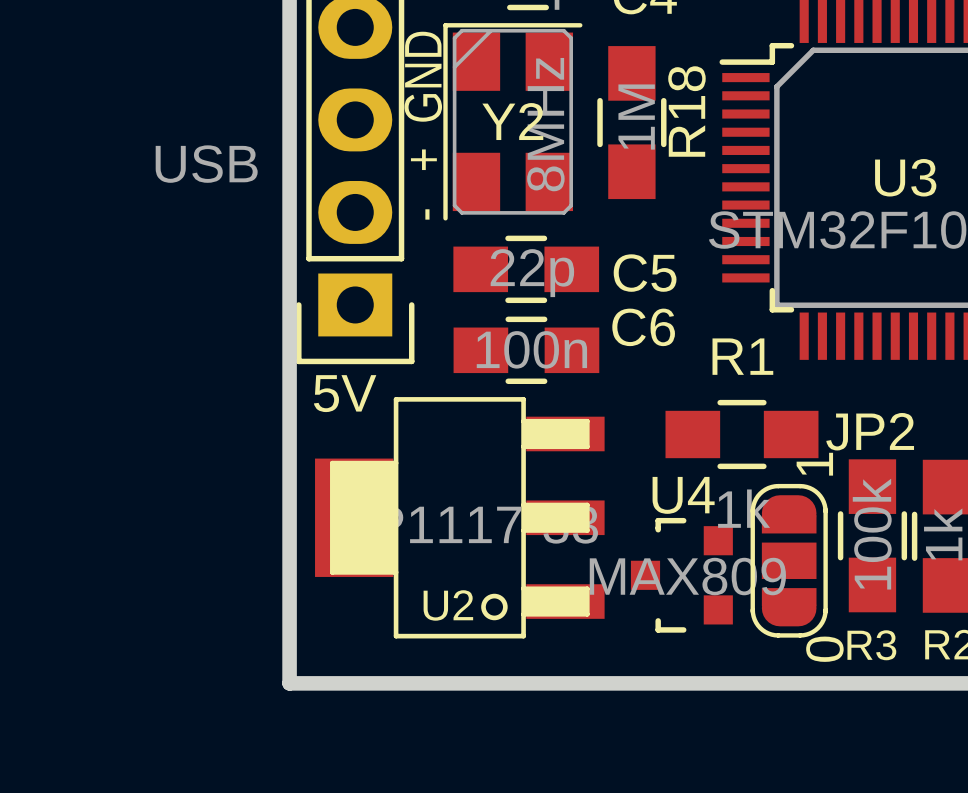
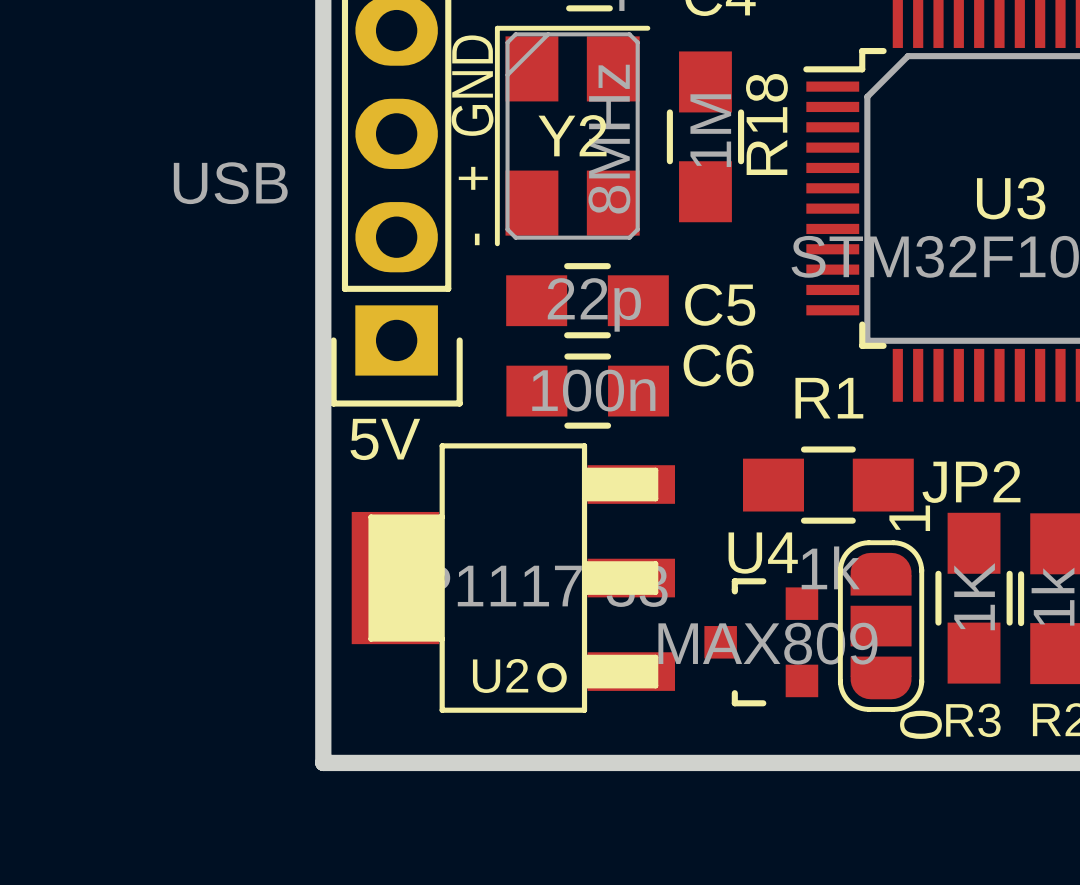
R3 value: 100k (872, 534) -> 1K (974, 596)

